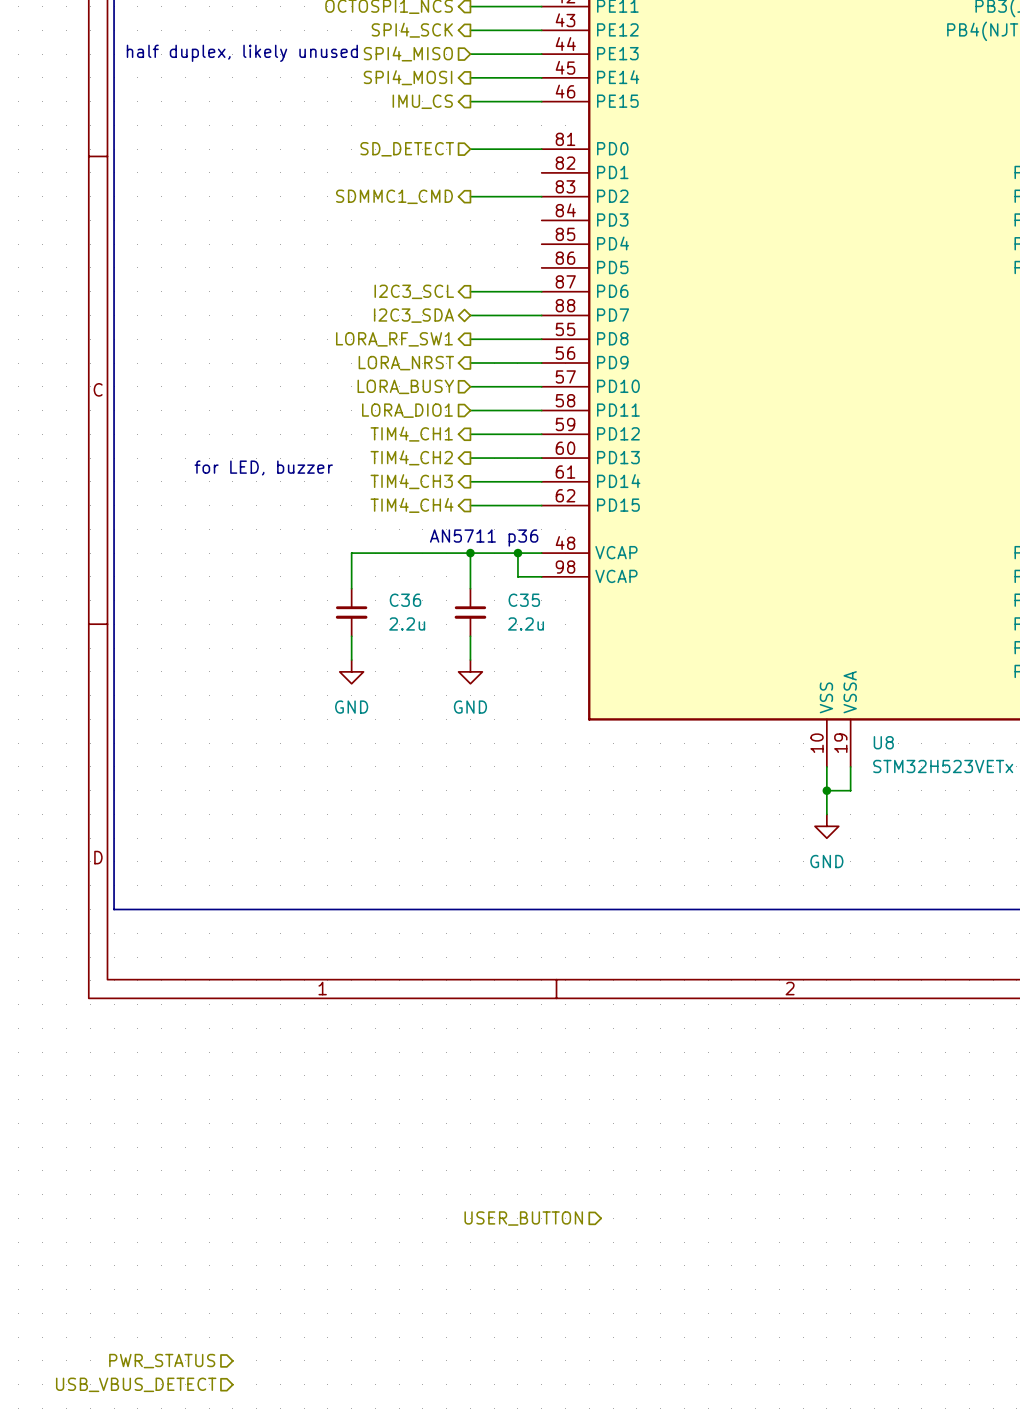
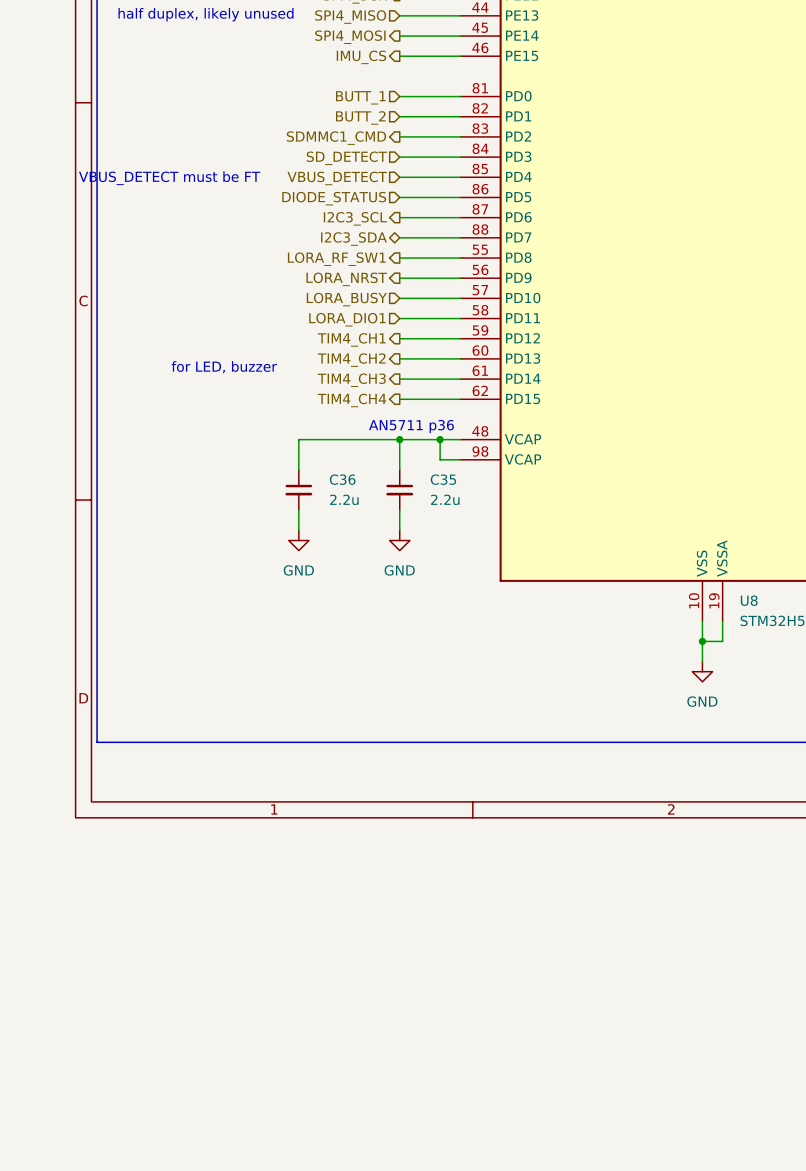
hierarchical label: SD_DETECT (407, 149) -> BUTT_1 (360, 97)
wire: none -> (399, 116) (460, 116)
hierarchical label: none -> BUTT_2 (360, 117)
hierarchical label: none -> SD_DETECT (346, 158)
wire: none -> (399, 157) (460, 157)
text: none -> VBUS_DETECT must be FT (169, 178)
hierarchical label: none -> VBUS_DETECT (337, 178)
wire: none -> (399, 177) (460, 177)
wire: none -> (399, 197) (460, 197)
hierarchical label: none -> DIODE_STATUS (334, 198)
hierarchical label: USER_BUTTON (523, 1218) -> none
hierarchical label: PWR_STATUS (162, 1361) -> none
hierarchical label: USB_VBUS_DETECT (136, 1384) -> none

